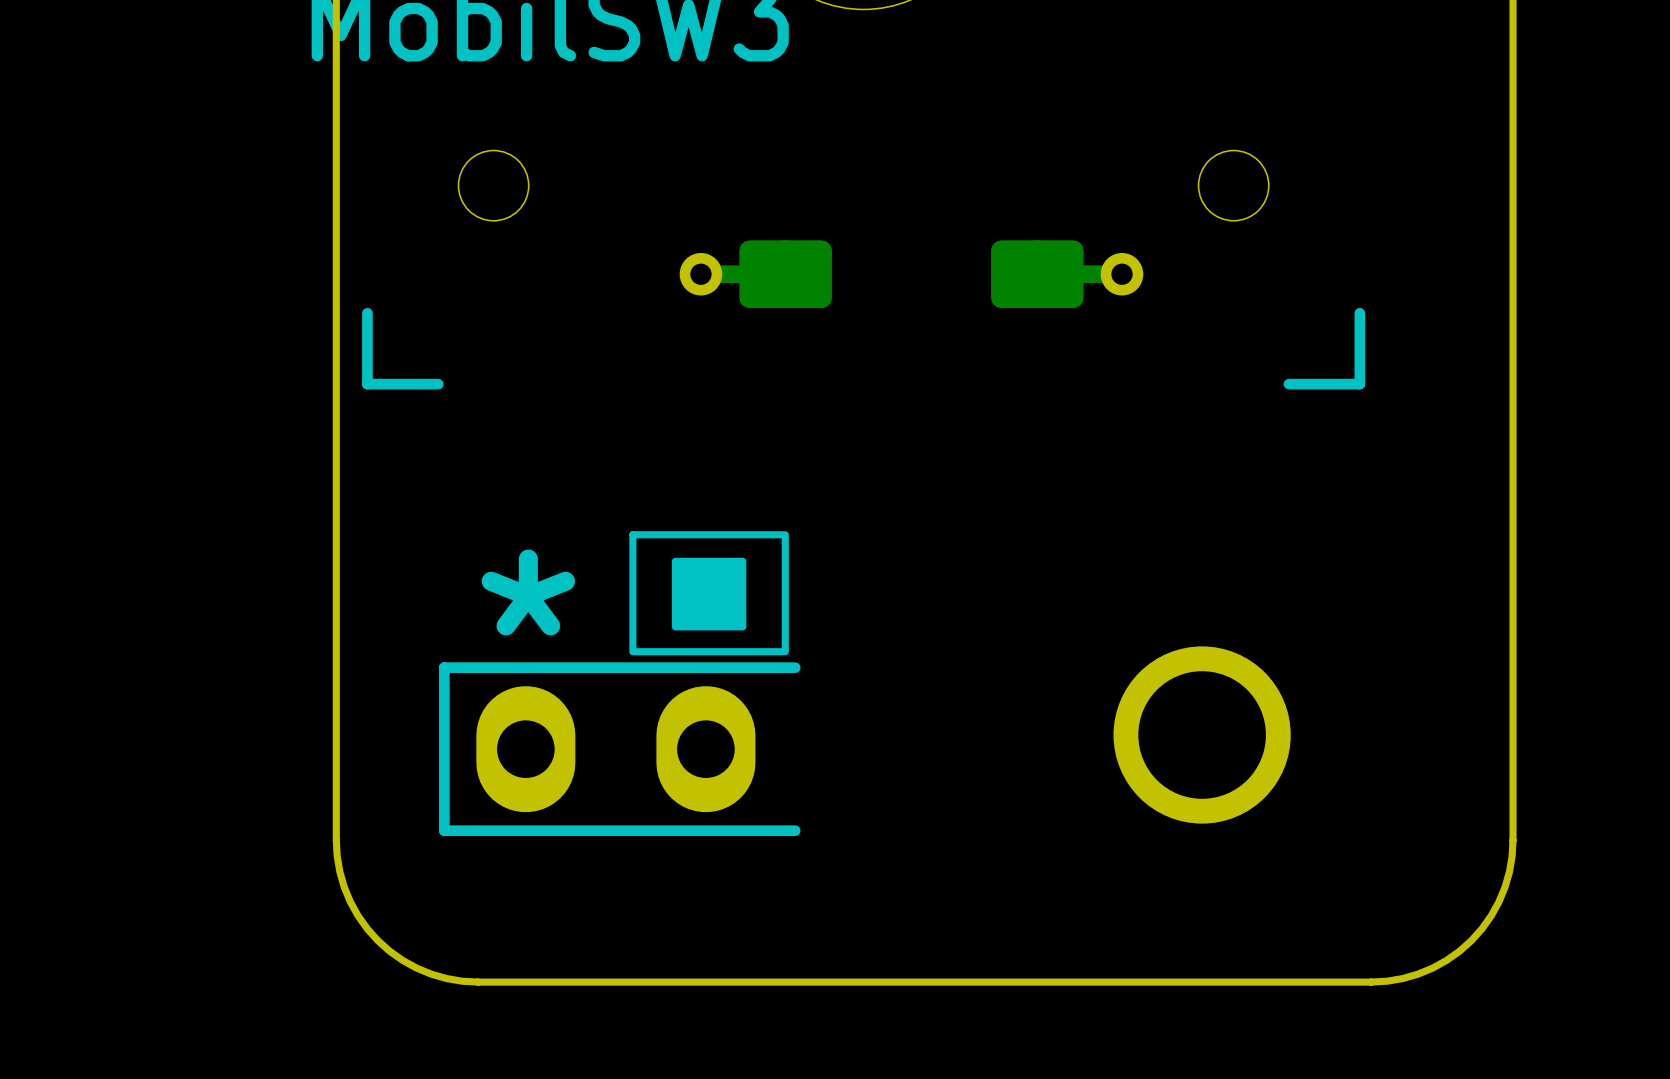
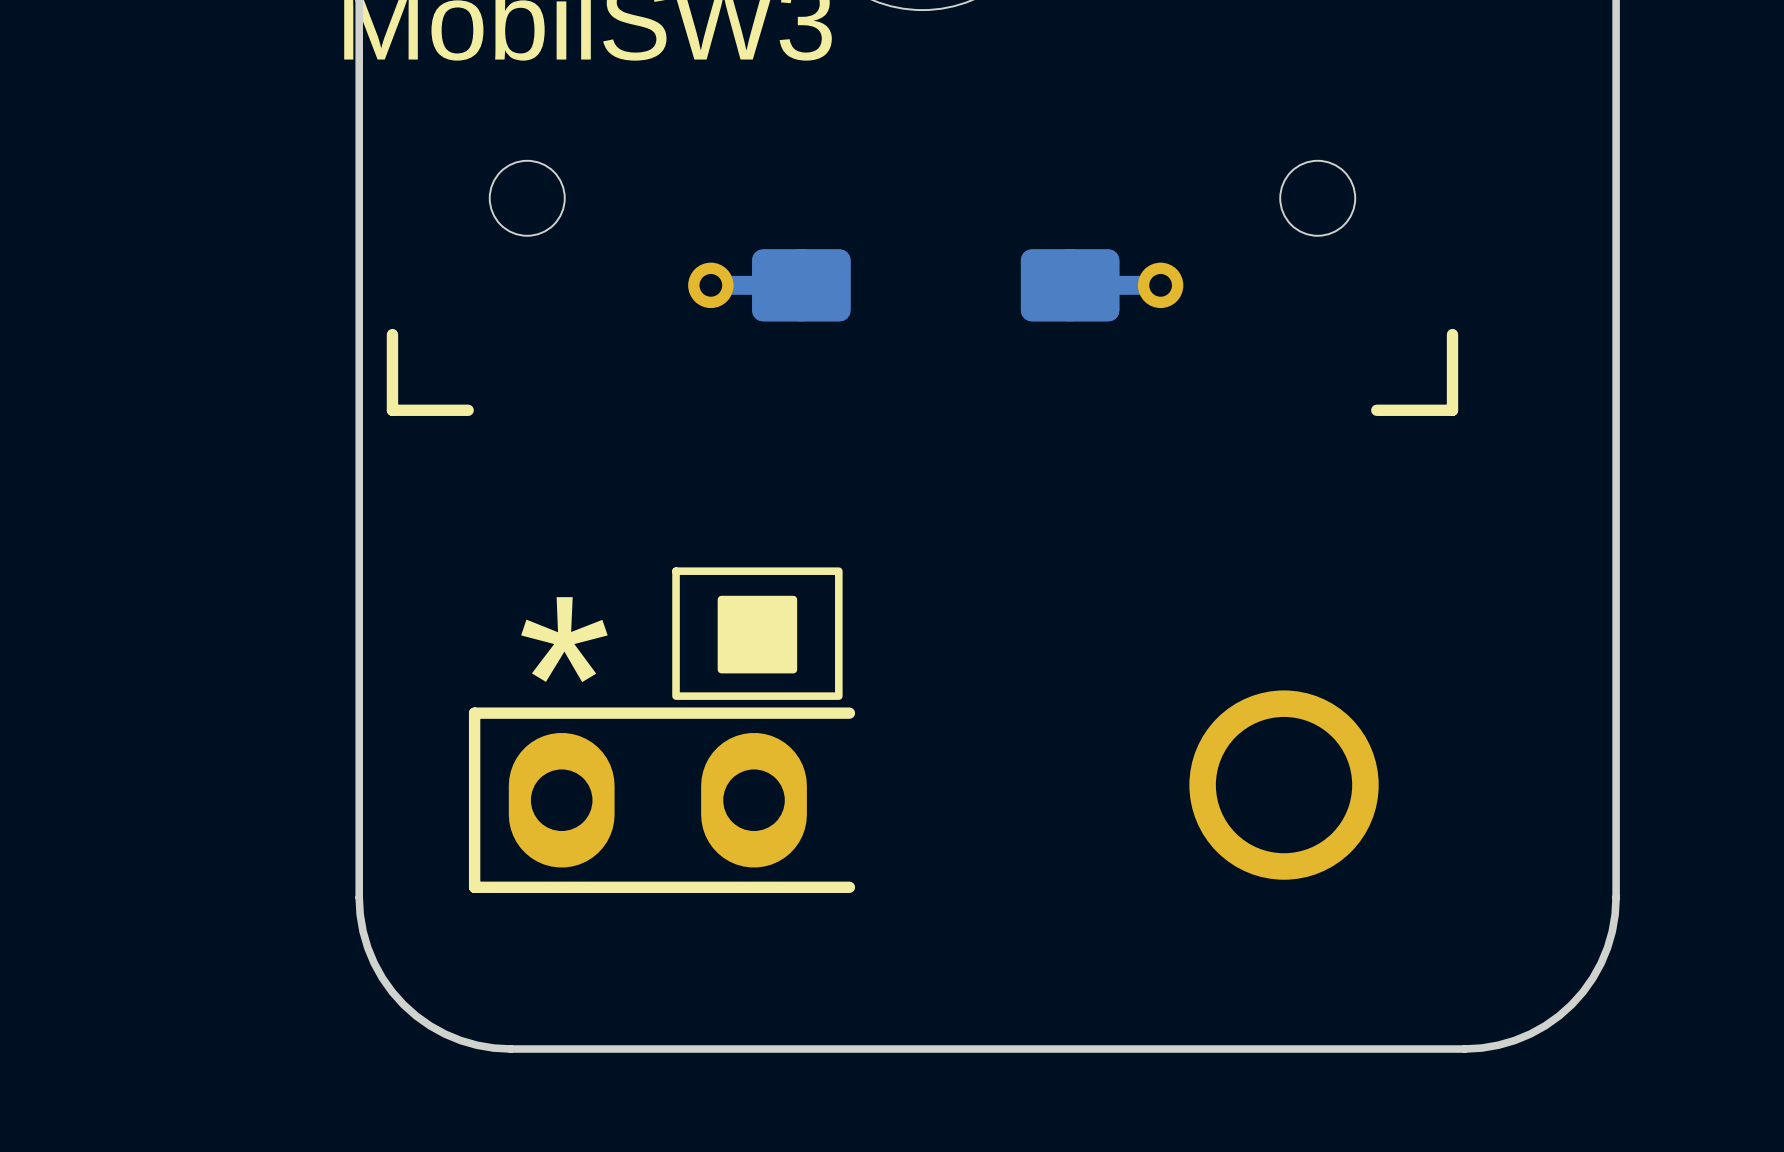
part position: (911, 274) -> (935, 285)

